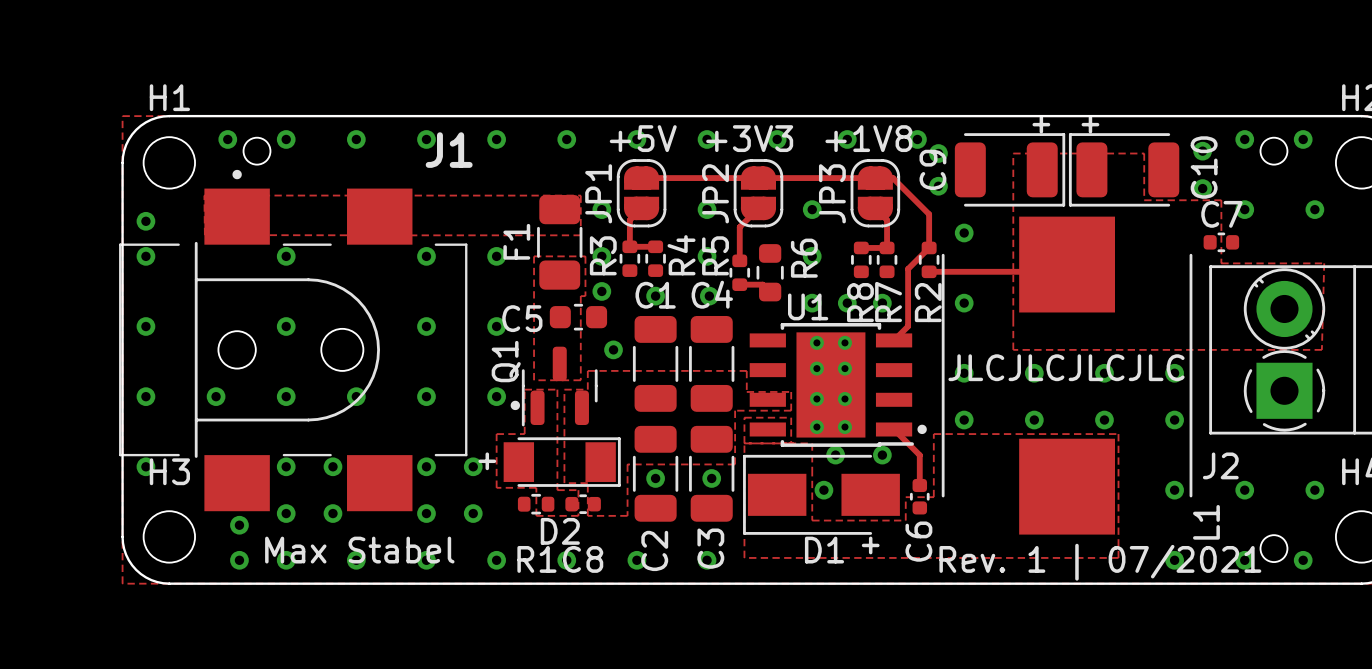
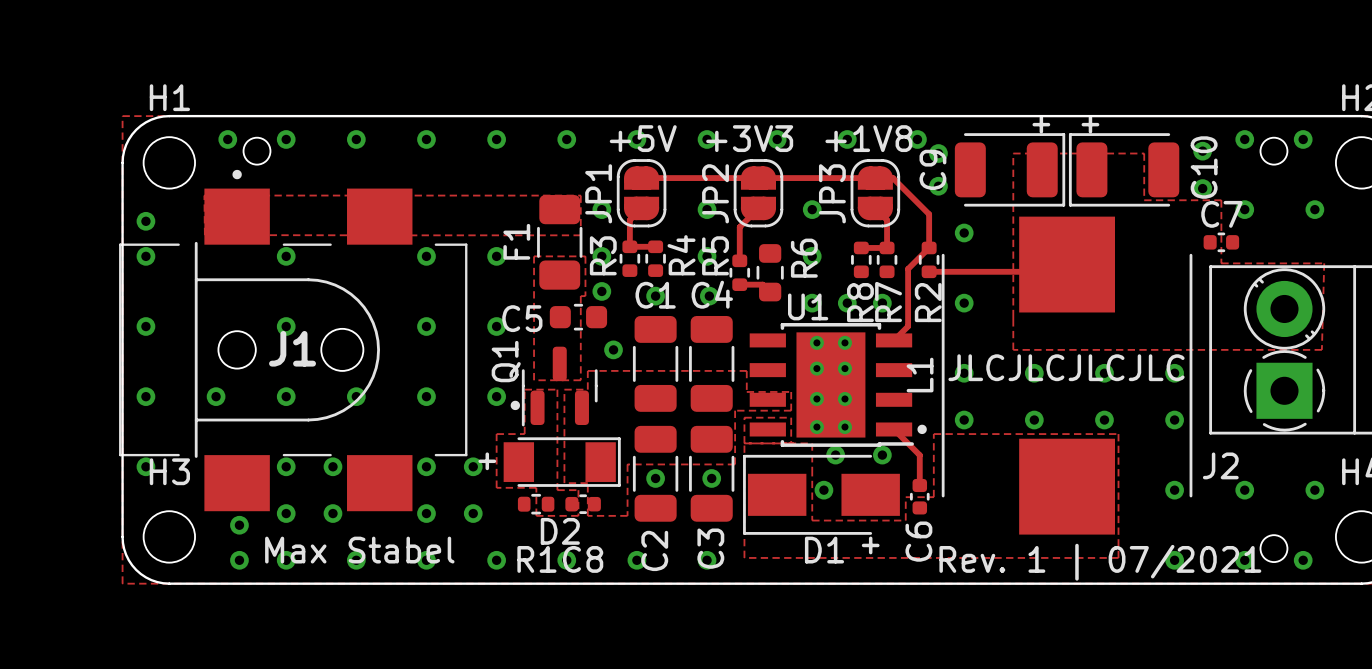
J1 name position: J1 (449, 150) -> J1 (292, 348)
L1 name position: L1 (1206, 522) -> L1 (920, 375)

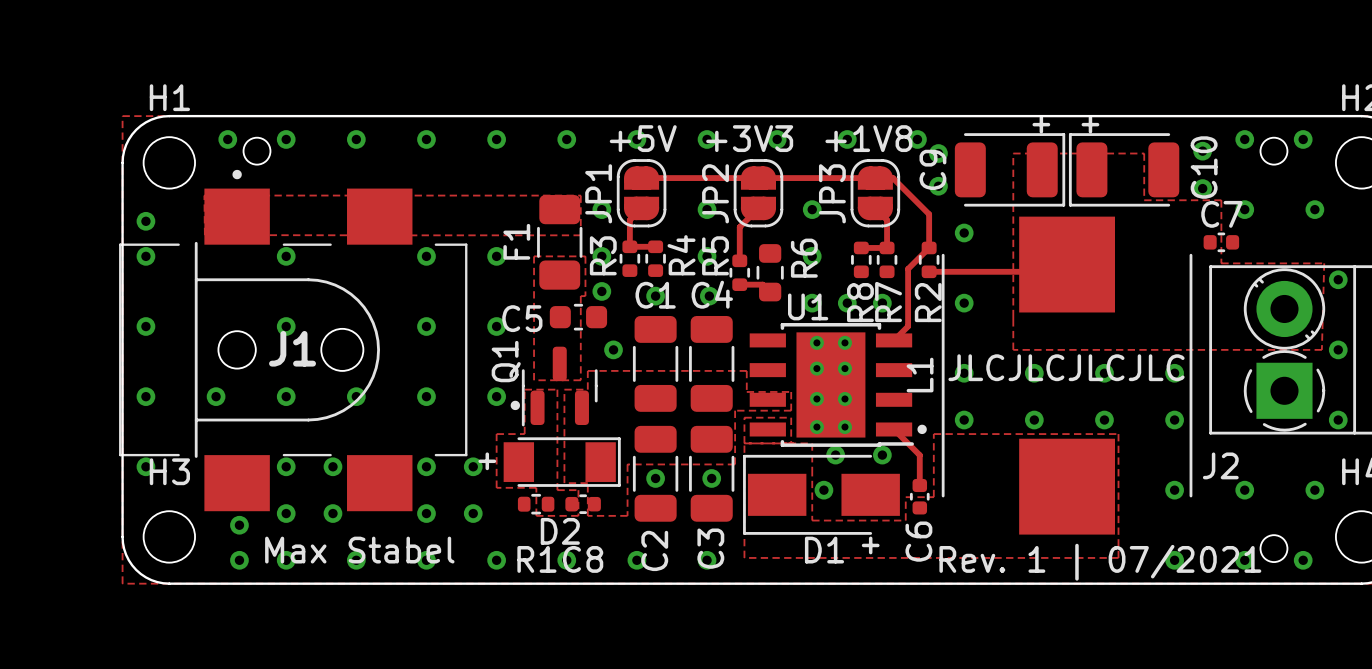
via: none -> (1338, 279)
via: none -> (1338, 349)
via: none -> (1338, 420)

